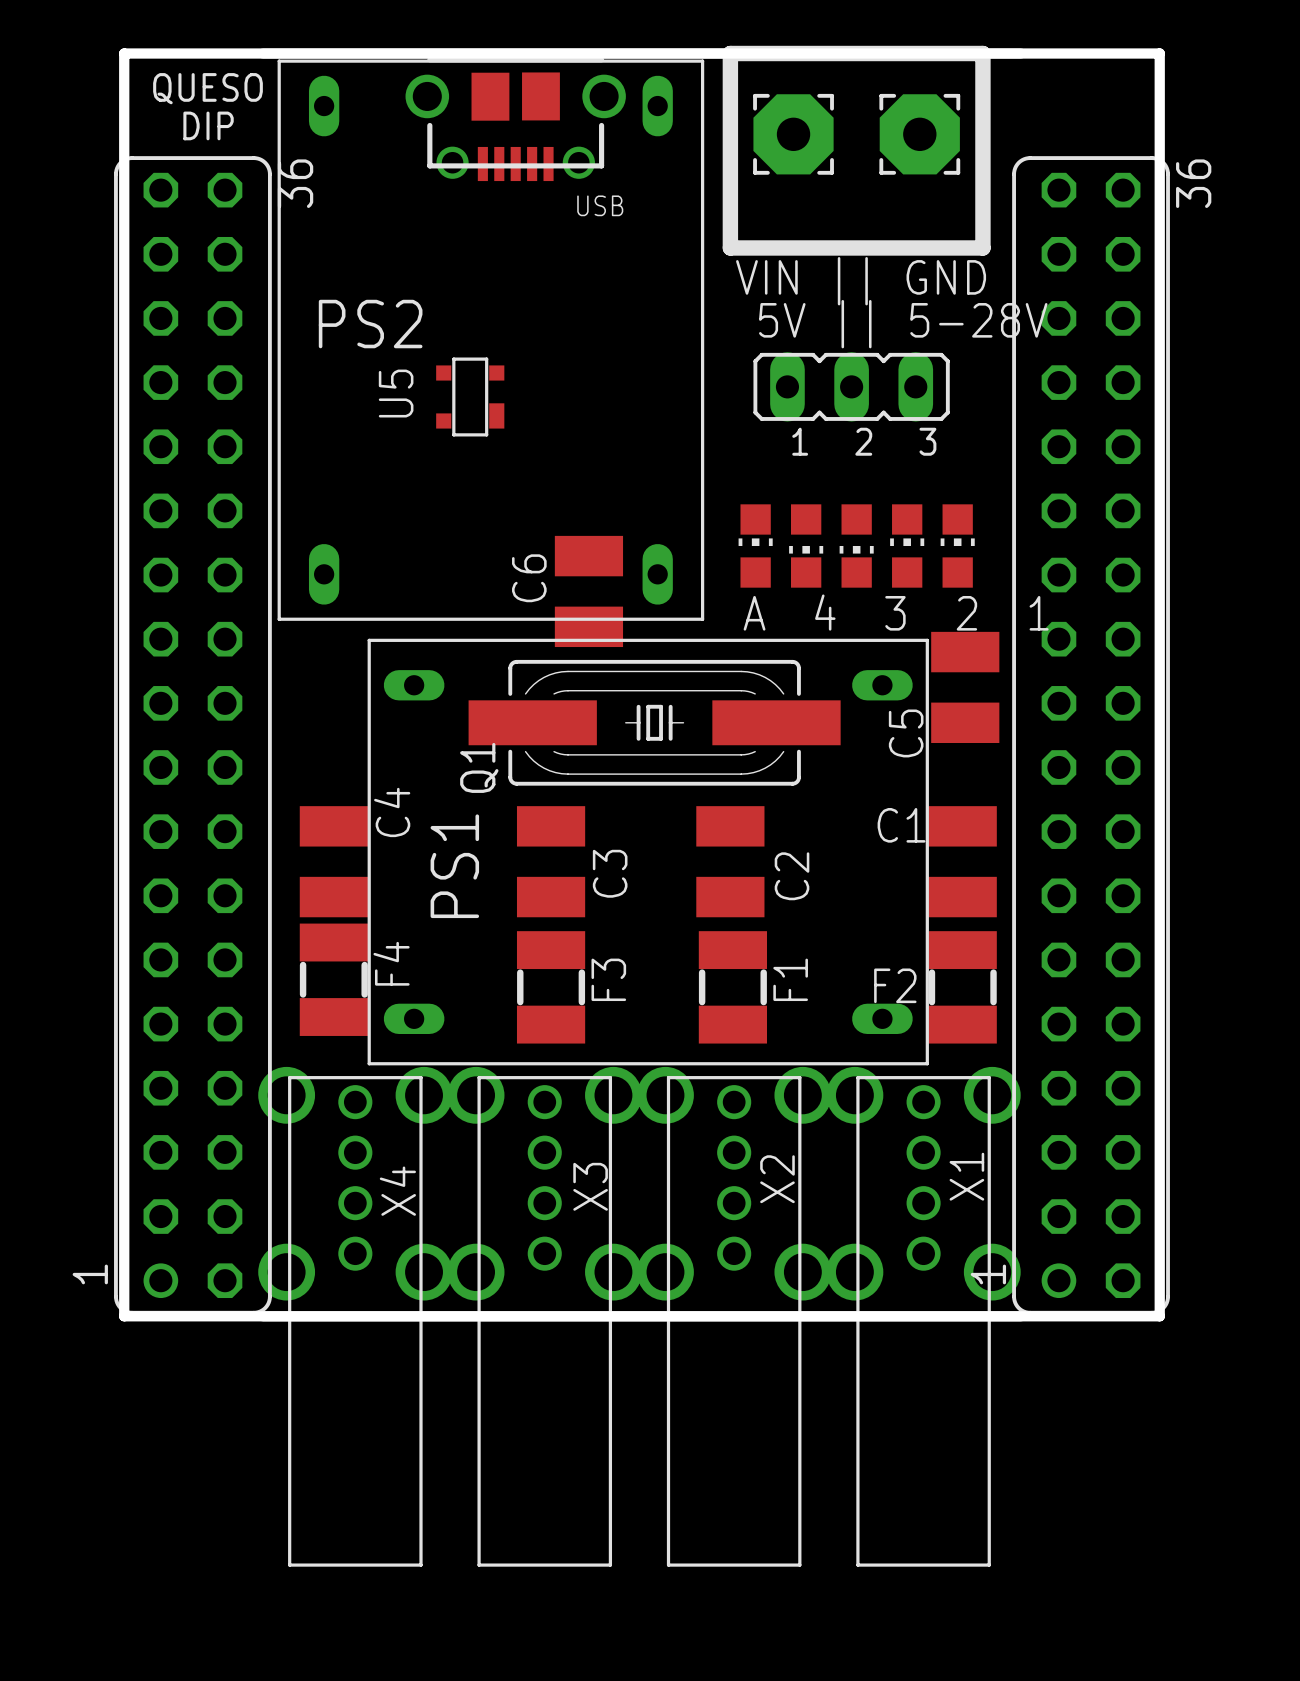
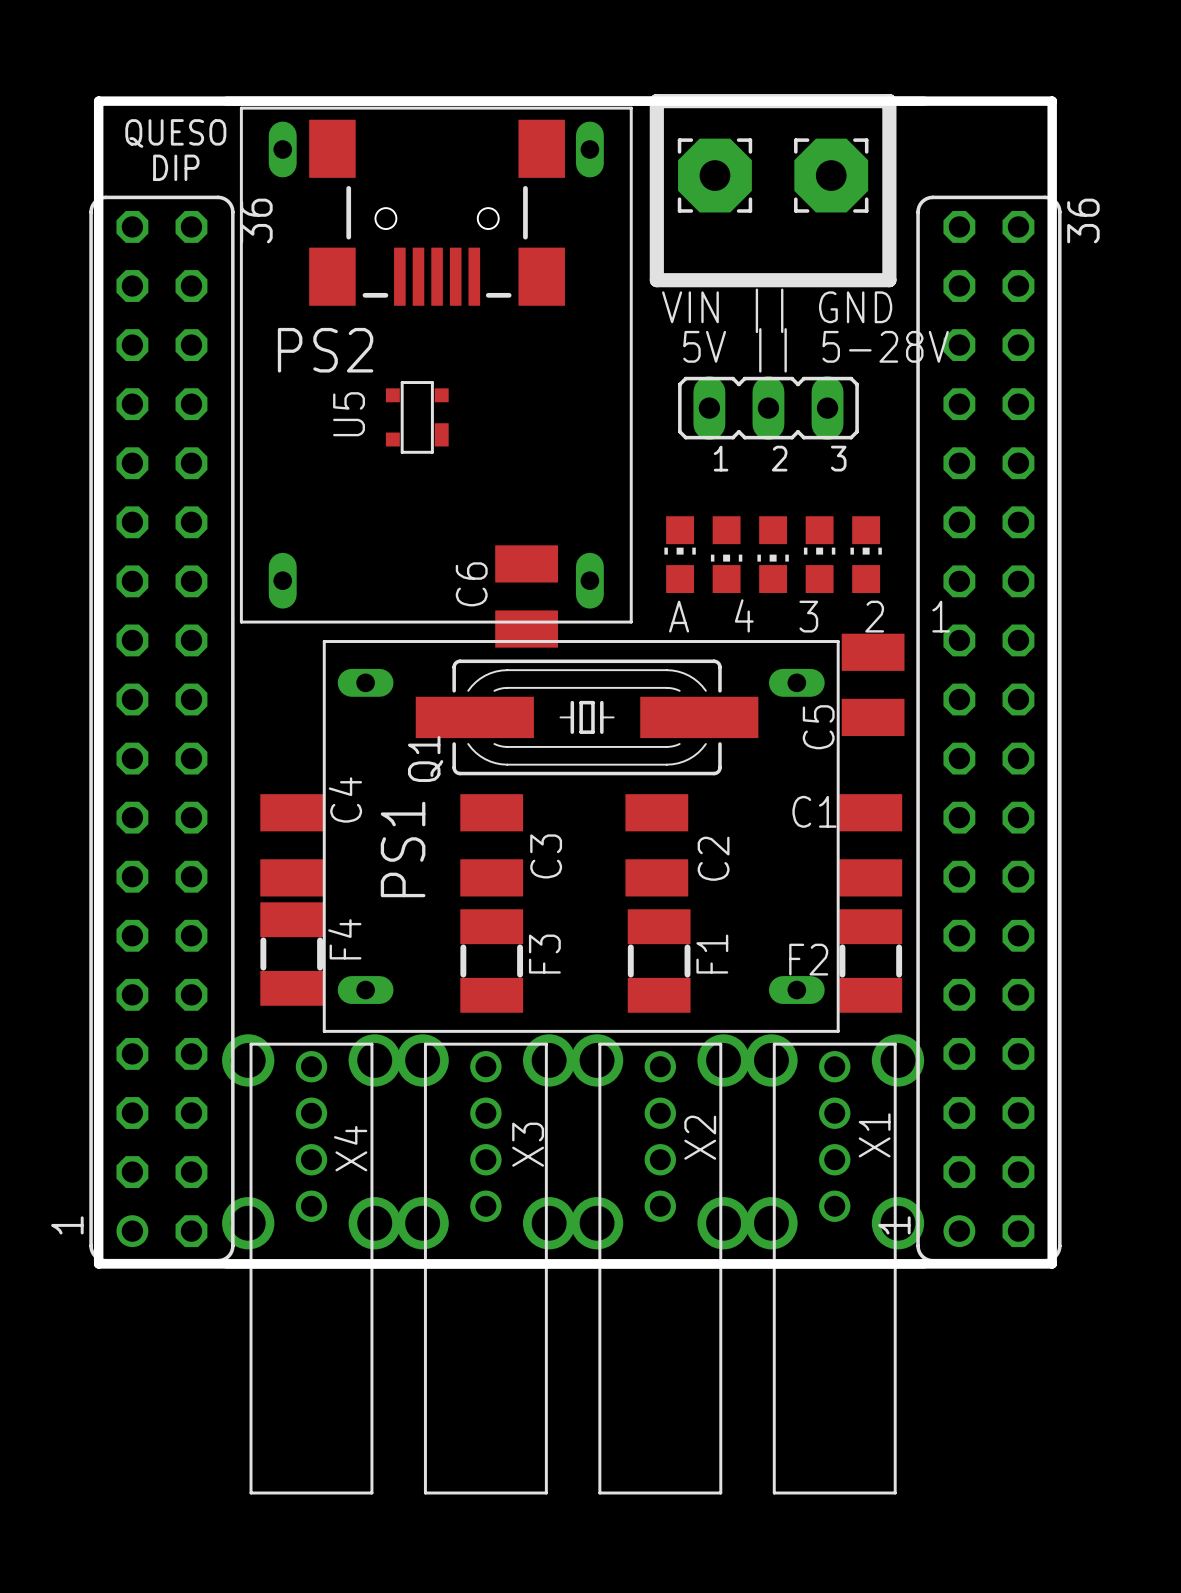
USB: (515, 119) -> none
part: none -> (437, 212)

